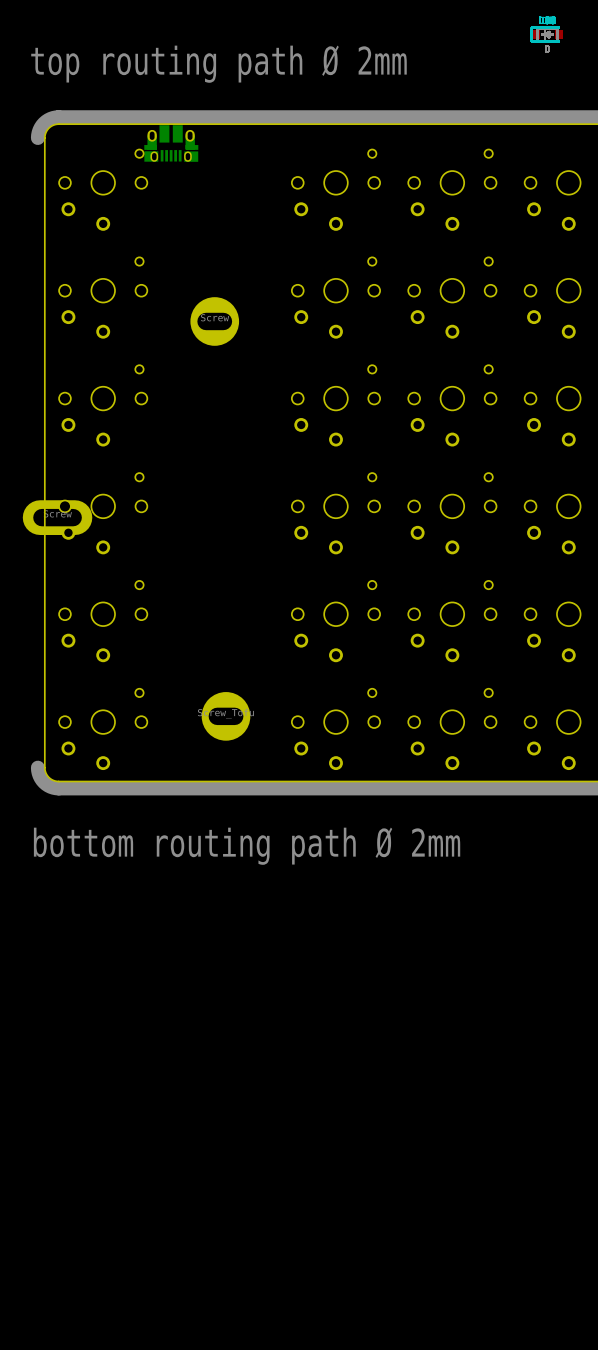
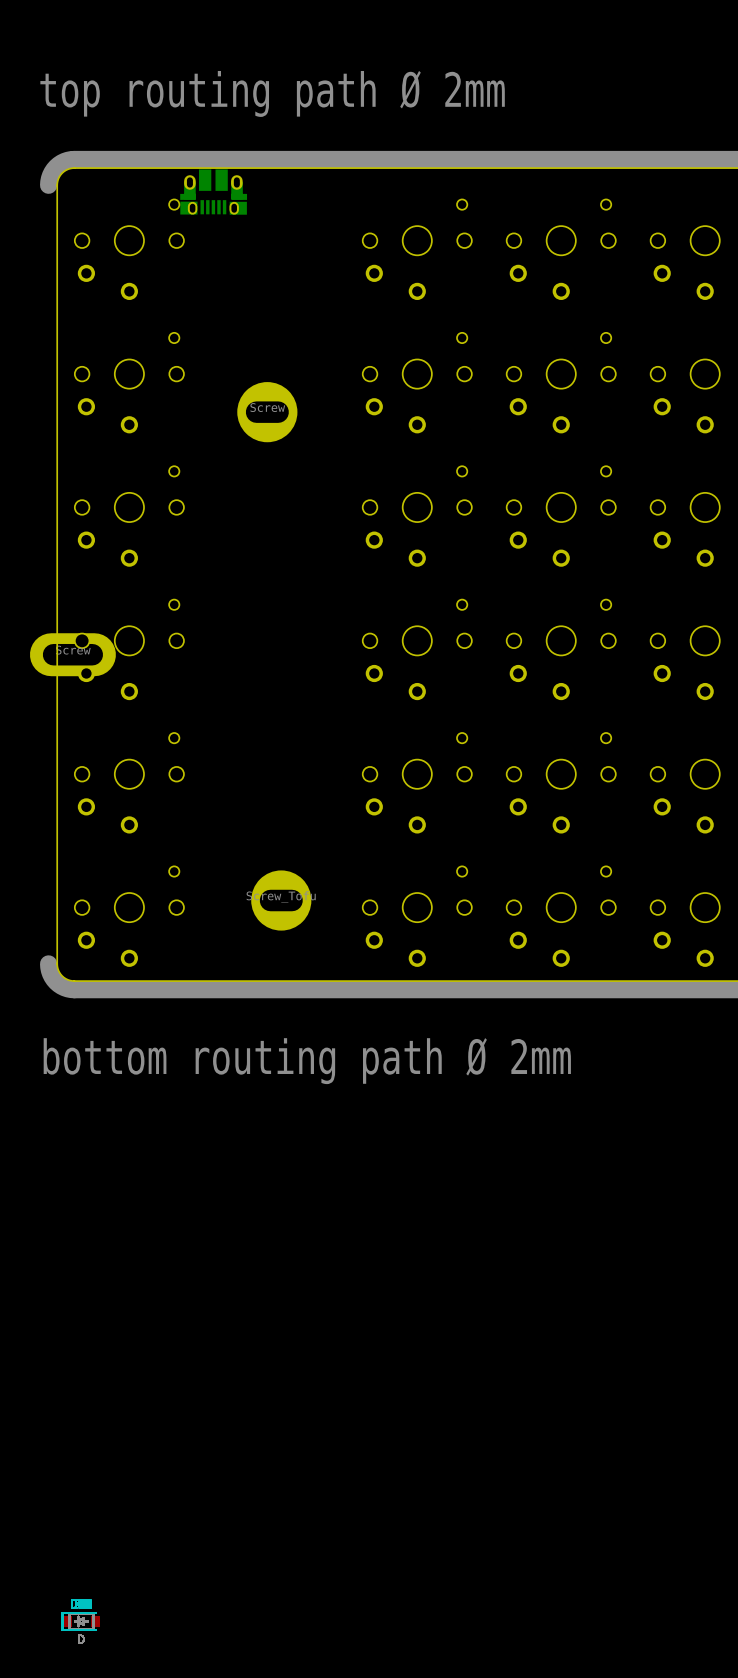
part position: (546, 34) -> (80, 1621)
part position: (546, 34) -> (80, 1621)
part position: (546, 34) -> (80, 1621)
part position: (546, 34) -> (80, 1621)
part position: (546, 34) -> (80, 1621)
part position: (546, 34) -> (80, 1621)
part position: (546, 34) -> (80, 1621)
part position: (546, 34) -> (80, 1621)
part position: (546, 34) -> (80, 1621)
part position: (546, 34) -> (80, 1621)
part position: (546, 34) -> (80, 1621)
part position: (546, 34) -> (80, 1621)
part position: (546, 34) -> (80, 1621)
part position: (546, 34) -> (80, 1621)
part position: (546, 34) -> (80, 1621)
part position: (546, 34) -> (80, 1621)
part position: (546, 34) -> (80, 1621)
part position: (546, 34) -> (80, 1621)
part position: (546, 34) -> (80, 1621)
part position: (546, 34) -> (80, 1621)
part position: (546, 34) -> (80, 1621)
part position: (546, 34) -> (80, 1621)
part position: (546, 34) -> (80, 1621)
part position: (546, 34) -> (80, 1621)
part position: (546, 34) -> (80, 1621)
part position: (546, 34) -> (80, 1621)
part position: (546, 34) -> (80, 1621)
part position: (546, 34) -> (80, 1621)
part position: (546, 34) -> (80, 1621)
part position: (546, 34) -> (80, 1621)
part position: (546, 34) -> (80, 1621)
part position: (546, 34) -> (80, 1621)
part position: (546, 34) -> (80, 1621)
part position: (546, 34) -> (80, 1621)
part position: (546, 34) -> (80, 1621)
part position: (546, 34) -> (80, 1621)
part position: (546, 34) -> (80, 1621)
part position: (546, 34) -> (80, 1621)
part position: (546, 34) -> (80, 1621)
part position: (546, 34) -> (80, 1621)
part position: (546, 34) -> (80, 1621)
part position: (546, 34) -> (80, 1621)
part position: (546, 34) -> (80, 1621)
part position: (546, 34) -> (80, 1621)
part position: (546, 34) -> (80, 1621)
part position: (546, 34) -> (80, 1621)
part position: (546, 34) -> (80, 1621)
part position: (546, 34) -> (80, 1621)
part position: (546, 34) -> (80, 1621)
part position: (546, 34) -> (80, 1621)
part position: (546, 34) -> (80, 1621)
part position: (546, 34) -> (80, 1621)
part position: (546, 34) -> (80, 1621)
part position: (546, 34) -> (80, 1621)
part position: (546, 34) -> (80, 1621)
part position: (546, 34) -> (80, 1621)
part position: (546, 34) -> (80, 1621)
part position: (546, 34) -> (80, 1621)
part position: (546, 34) -> (80, 1621)
part position: (546, 34) -> (80, 1621)
part position: (546, 34) -> (80, 1621)
part position: (546, 34) -> (80, 1621)
part position: (546, 34) -> (80, 1621)
part position: (546, 34) -> (80, 1621)
part position: (546, 34) -> (80, 1621)
part position: (546, 34) -> (80, 1621)
part position: (546, 34) -> (80, 1621)
part position: (546, 34) -> (80, 1621)
part position: (546, 34) -> (80, 1621)
part position: (546, 34) -> (80, 1621)
part position: (546, 34) -> (80, 1621)
part position: (546, 34) -> (80, 1621)
part position: (546, 34) -> (80, 1621)
part position: (546, 34) -> (80, 1621)
part position: (546, 34) -> (80, 1621)
part position: (546, 34) -> (80, 1621)
part position: (546, 34) -> (80, 1621)
part position: (546, 34) -> (80, 1621)
part position: (546, 34) -> (80, 1621)
part position: (546, 34) -> (80, 1621)
part position: (546, 34) -> (80, 1621)
part position: (546, 34) -> (80, 1621)
part position: (546, 34) -> (80, 1621)
part position: (546, 34) -> (80, 1621)
part position: (546, 34) -> (80, 1621)
part position: (546, 34) -> (80, 1621)
part position: (546, 34) -> (80, 1621)
part position: (546, 34) -> (80, 1621)

